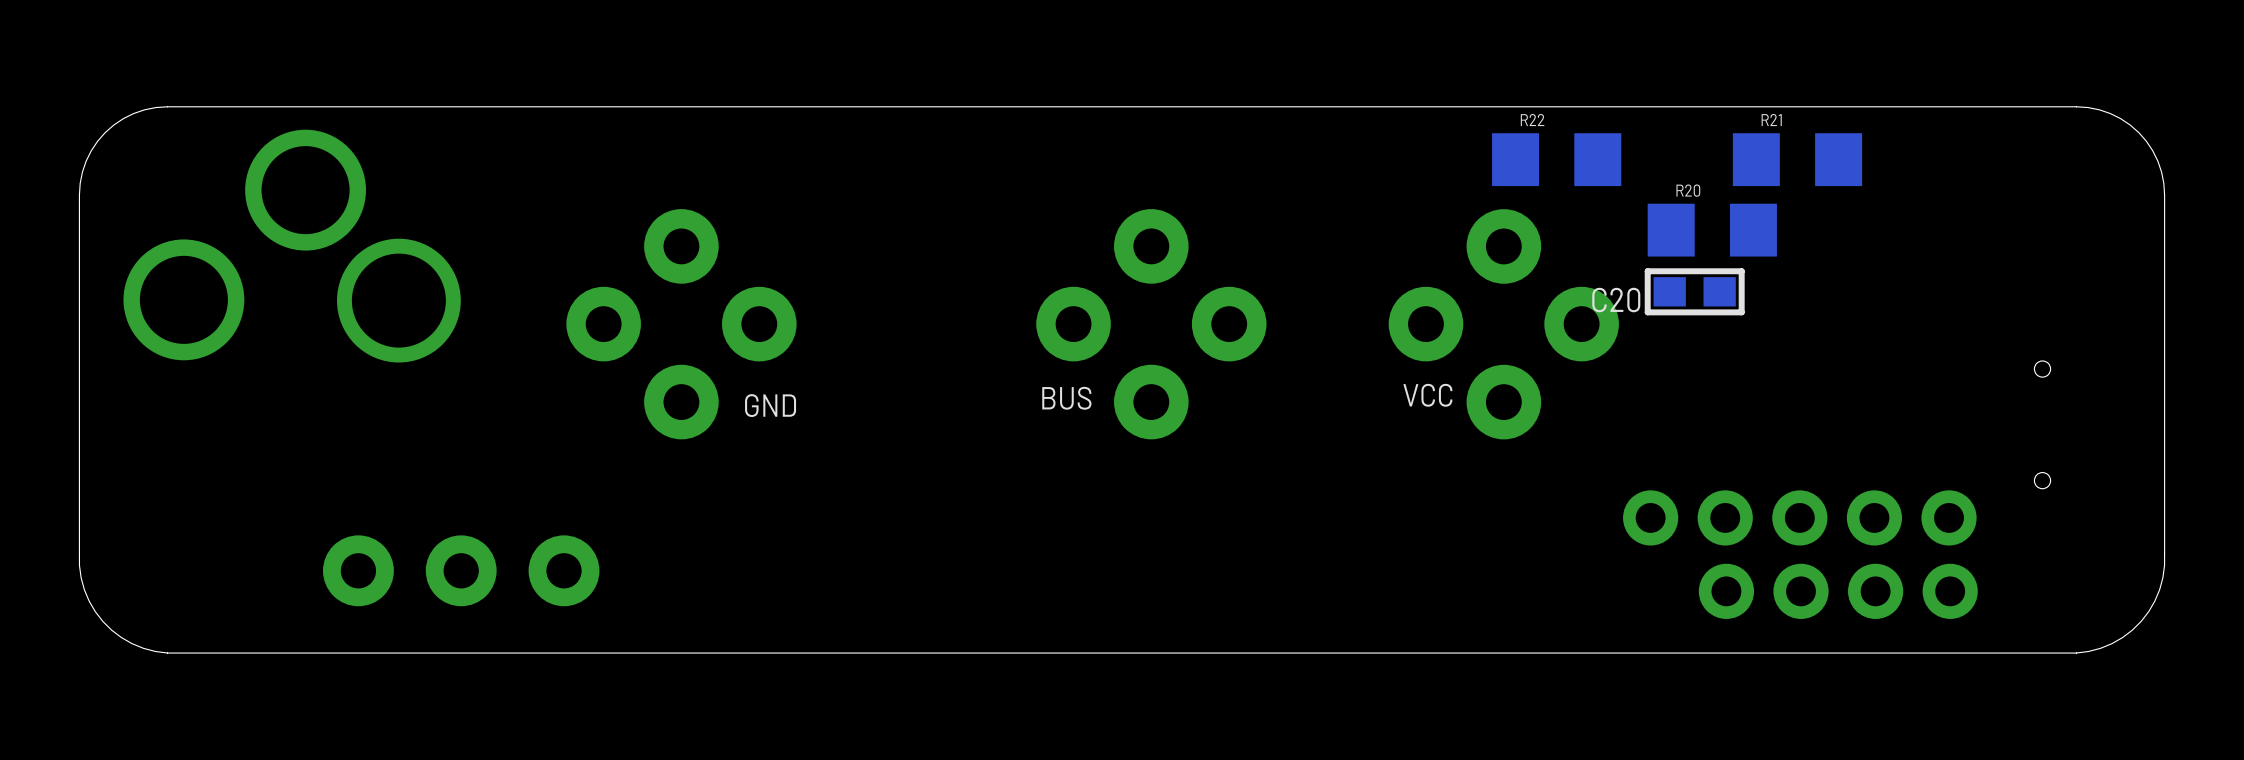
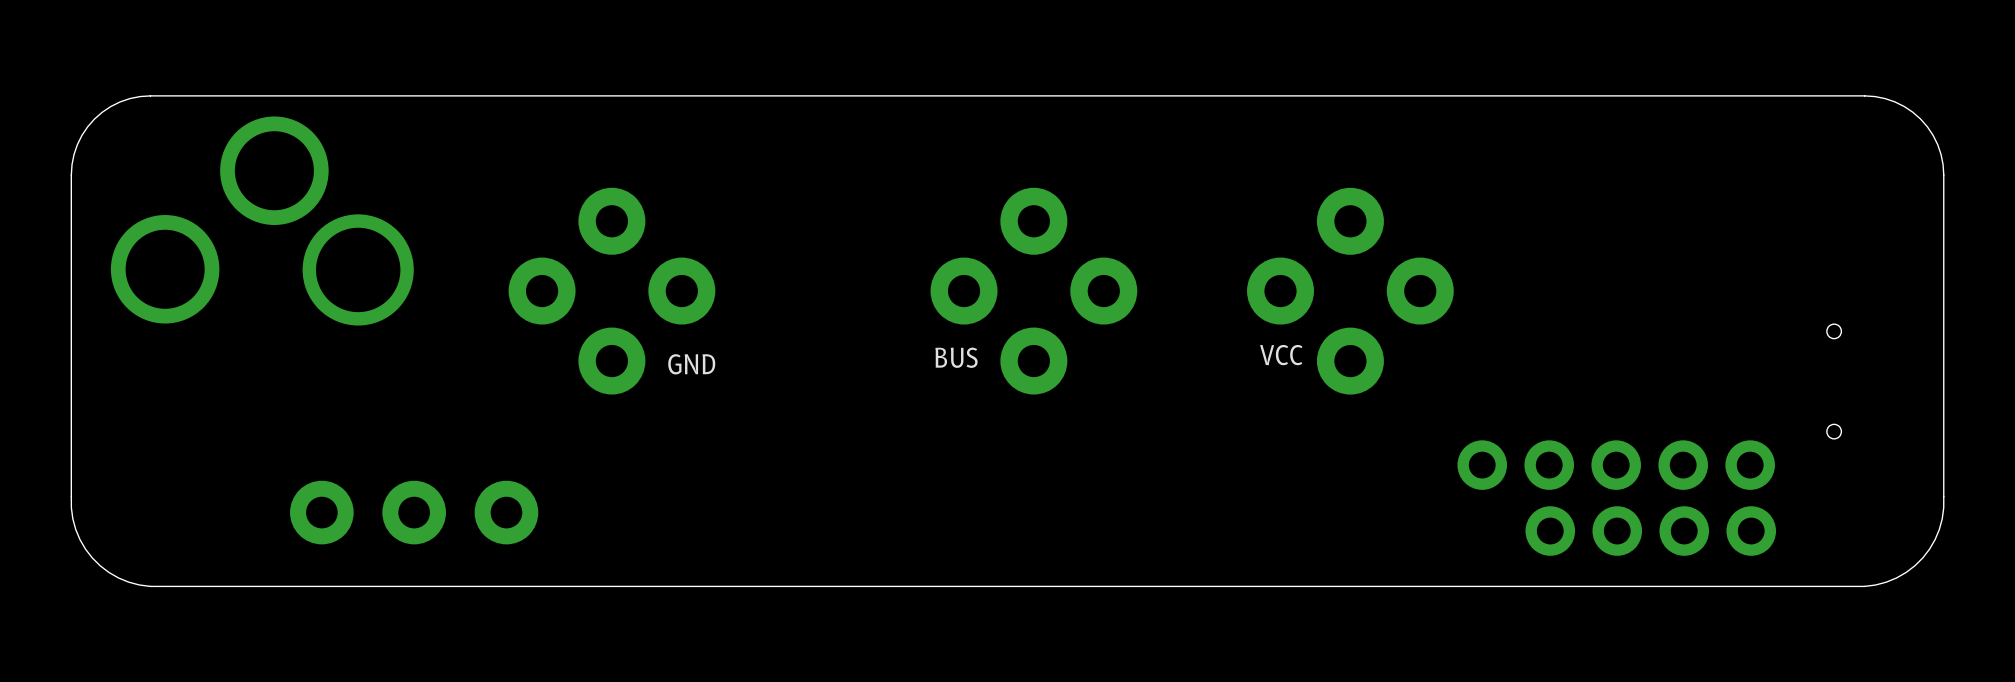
R22: (1556, 159) -> none
R21: (1797, 159) -> none
R20: (1712, 230) -> none
C20: (1694, 291) -> none

